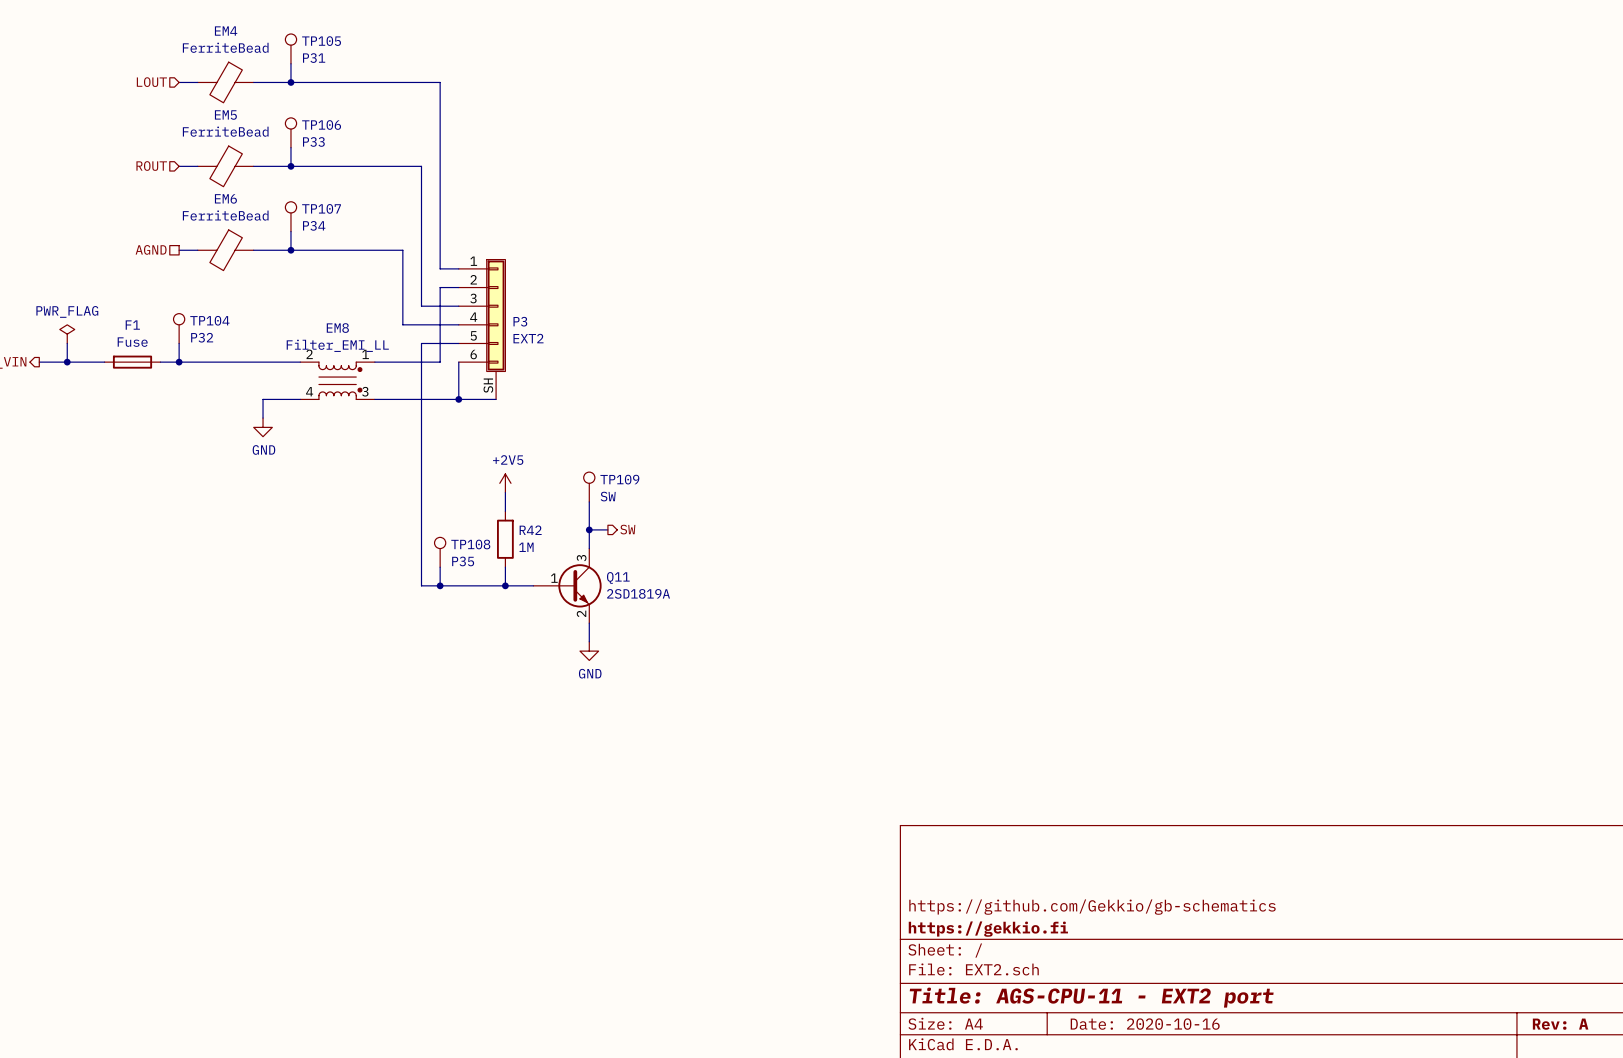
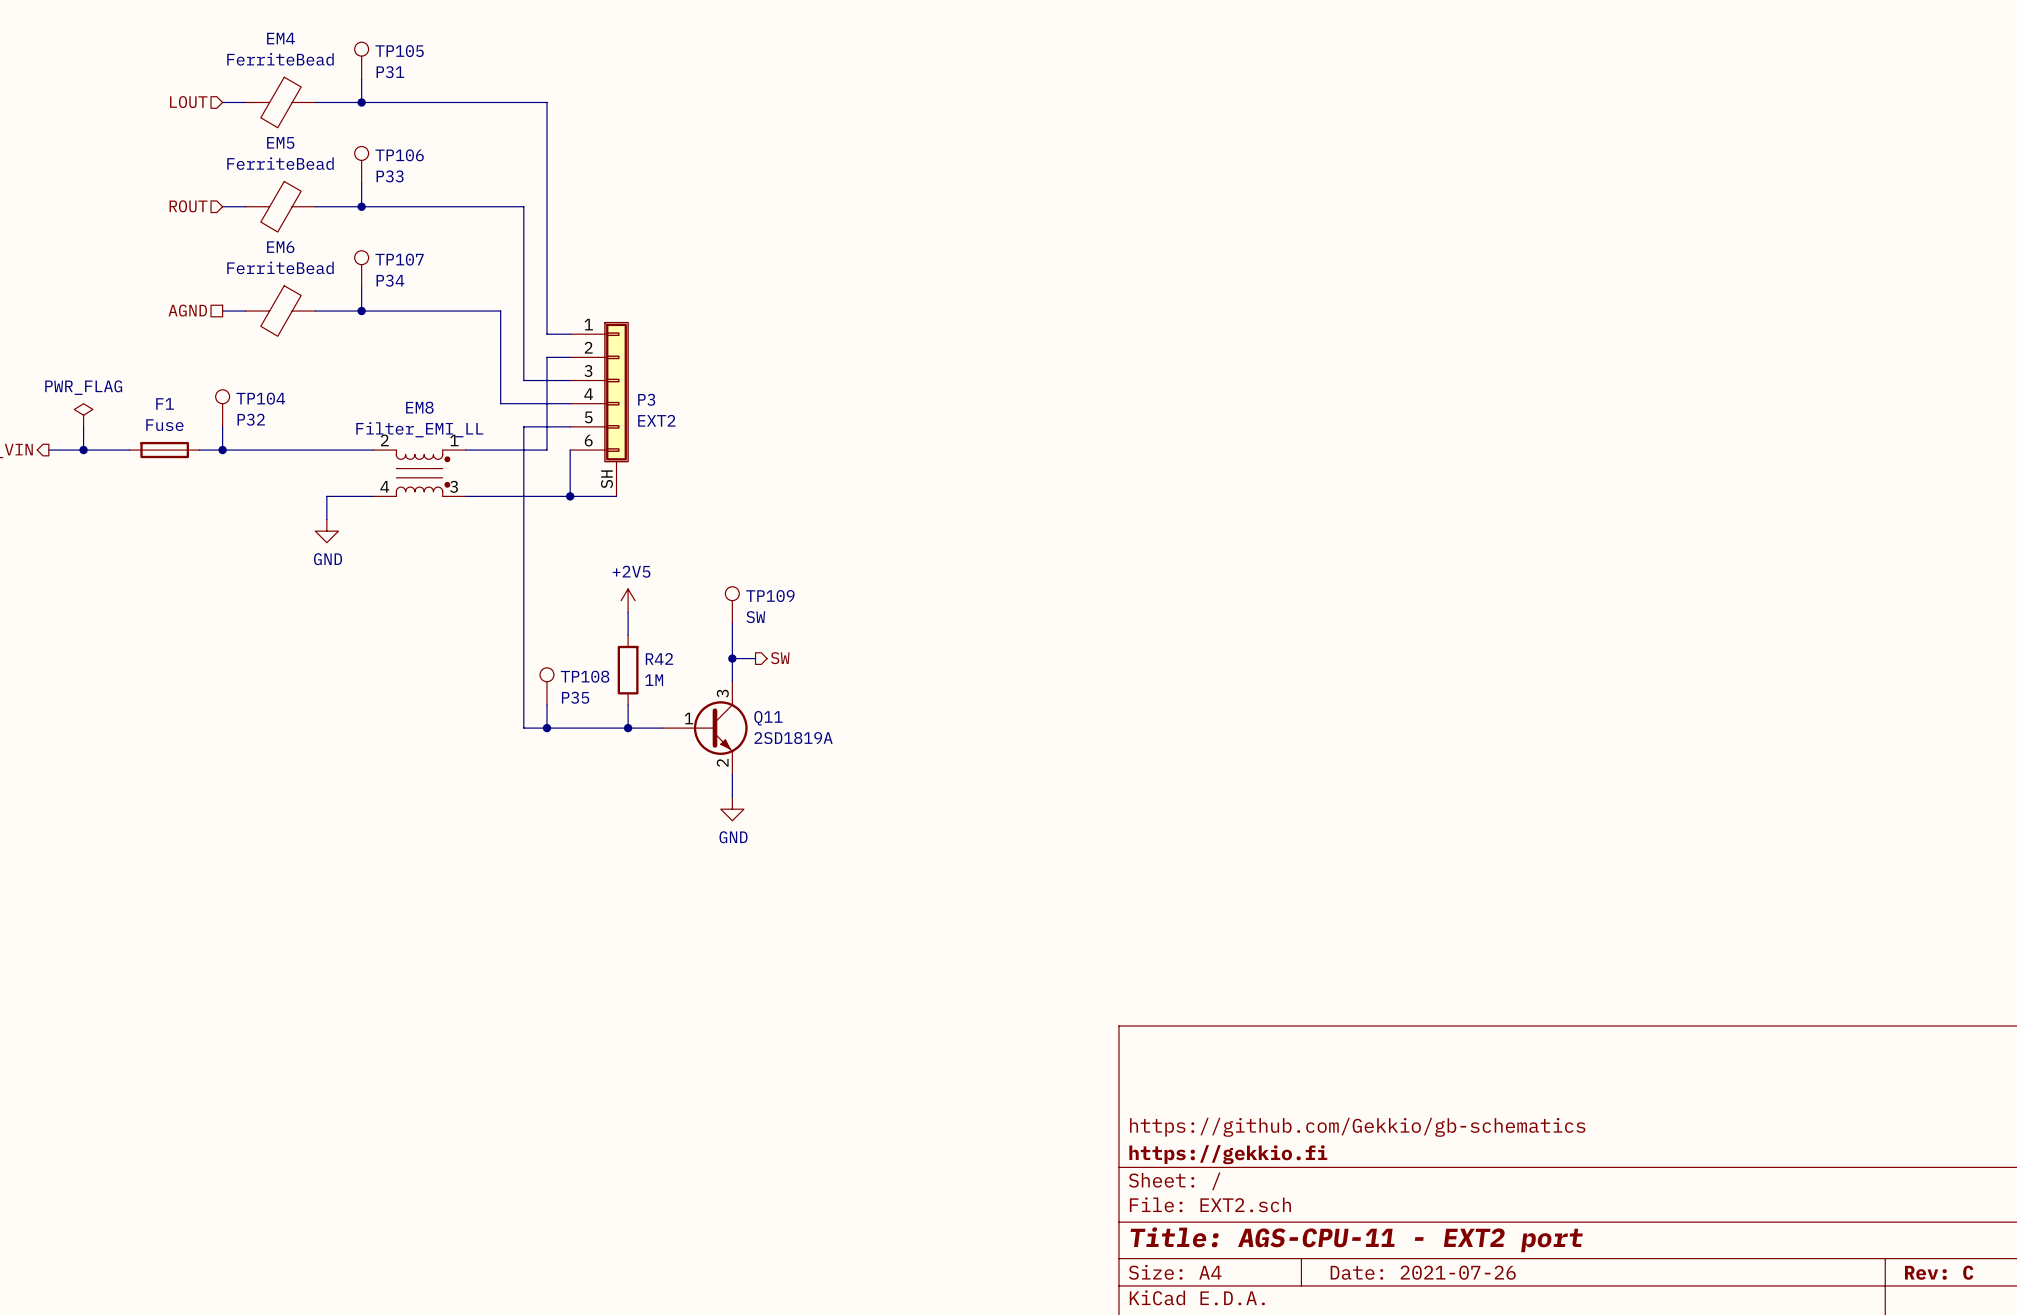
title block: Date: 2020-10-16 (1145, 1024) -> Date: 2021-07-26 (1423, 1272)
title block: Rev: A (1560, 1024) -> Rev: C (1939, 1272)

